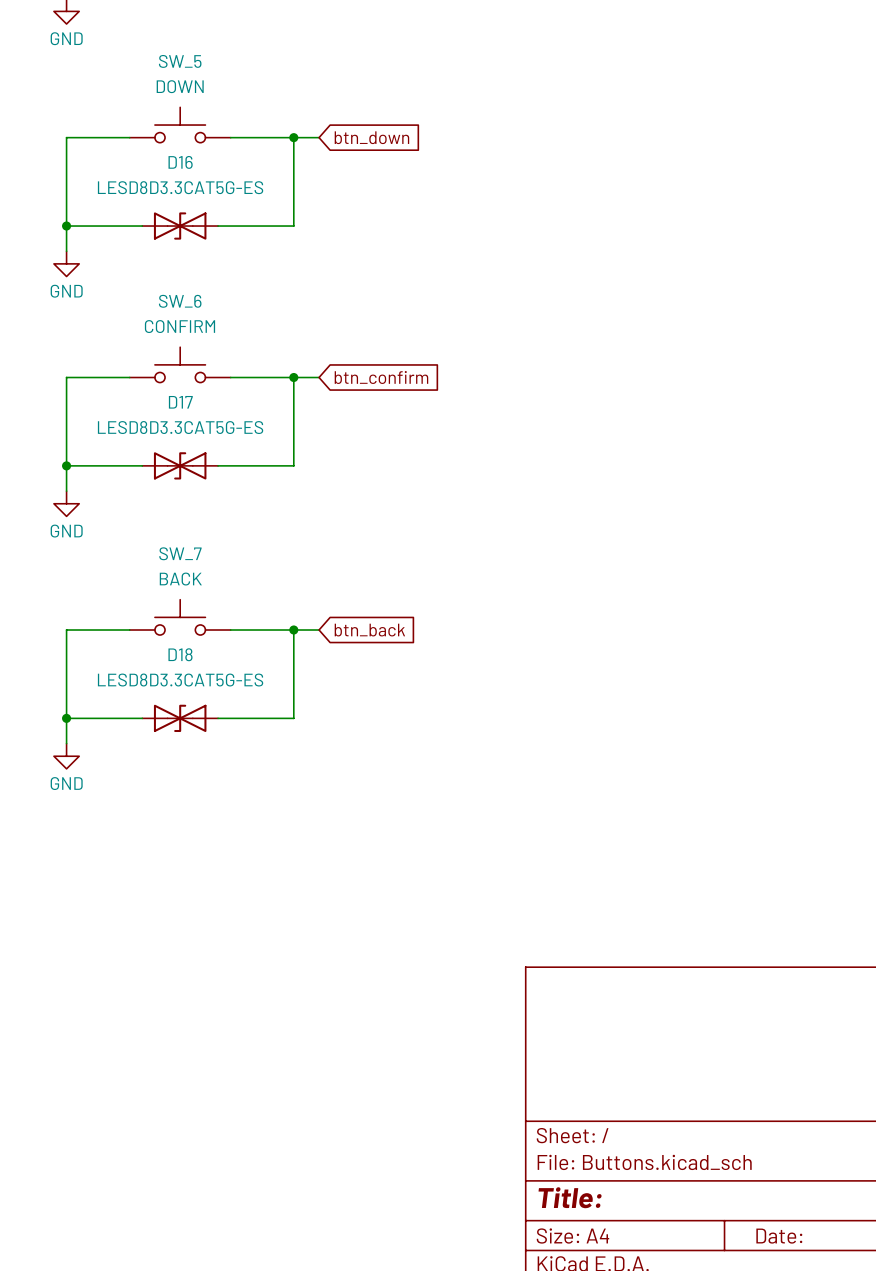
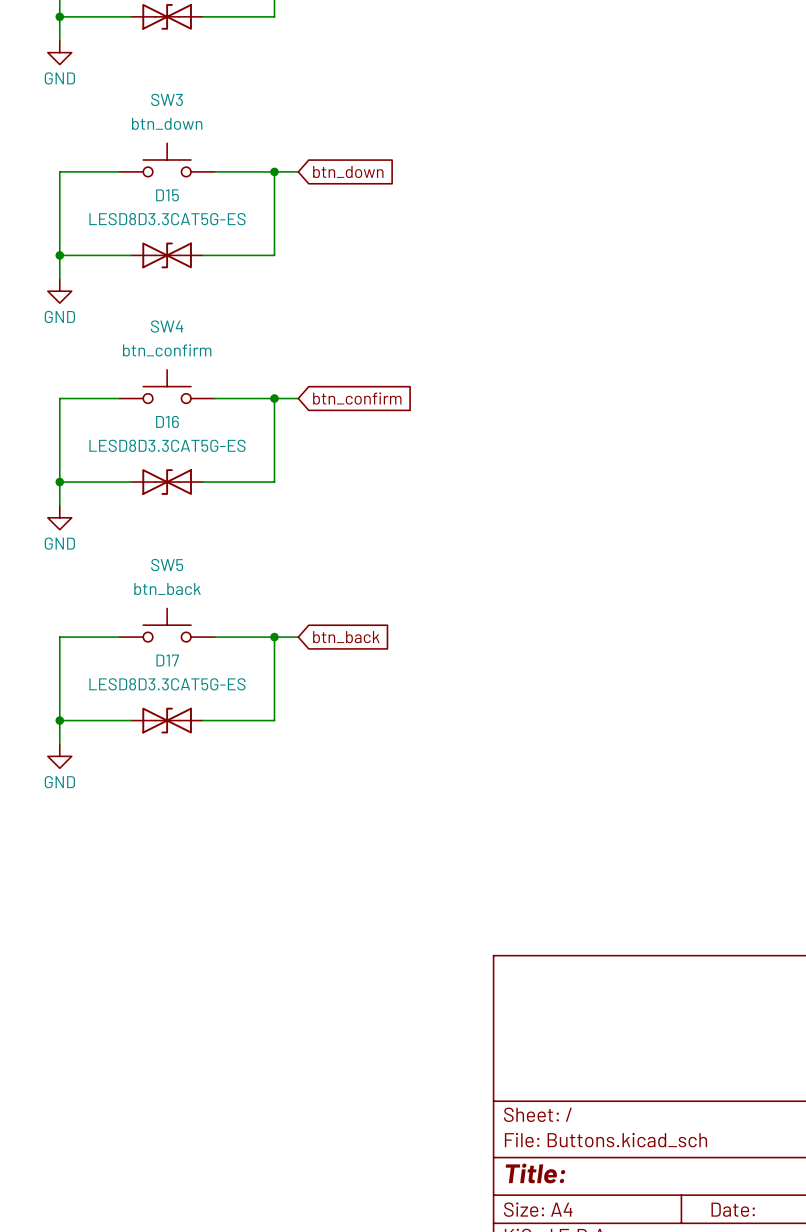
SW_5 name: SW_5 (180, 61) -> SW3 (167, 99)
SW_5 value: DOWN (180, 86) -> btn_down (167, 123)
D16 name: D16 (180, 162) -> D15 (167, 195)
SW_6 name: SW_6 (180, 301) -> SW4 (167, 326)
SW_6 value: CONFIRM (180, 326) -> btn_confirm (167, 350)
D17 name: D17 (180, 402) -> D16 (167, 421)
SW_7 name: SW_7 (180, 553) -> SW5 (167, 565)
SW_7 value: BACK (180, 579) -> btn_back (167, 589)
D18 name: D18 (180, 654) -> D17 (167, 660)

